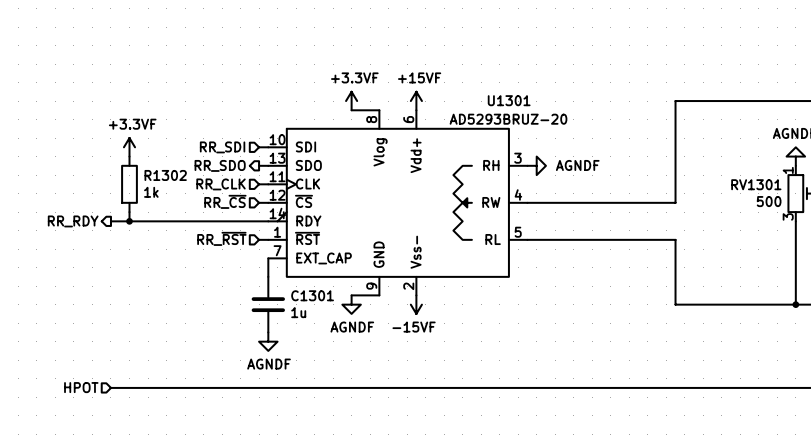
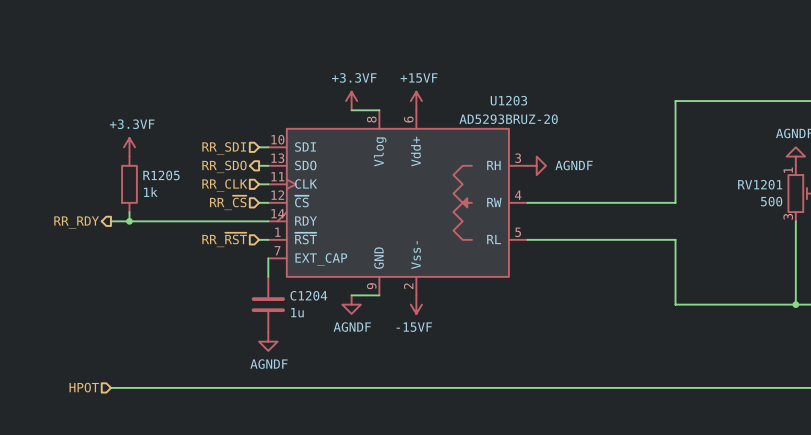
U1301 name: U1301 (509, 100) -> U1203 (508, 100)
R1302 name: R1302 (165, 175) -> R1205 (161, 175)
RV1301 name: RV1301 (756, 184) -> RV1201 (760, 184)
C1301 name: C1301 (312, 295) -> C1204 (308, 295)

